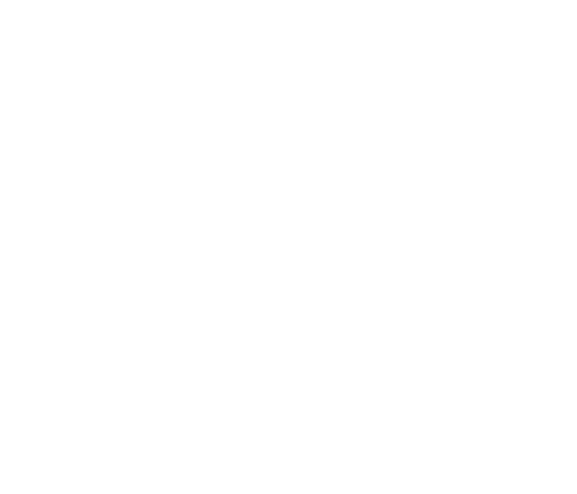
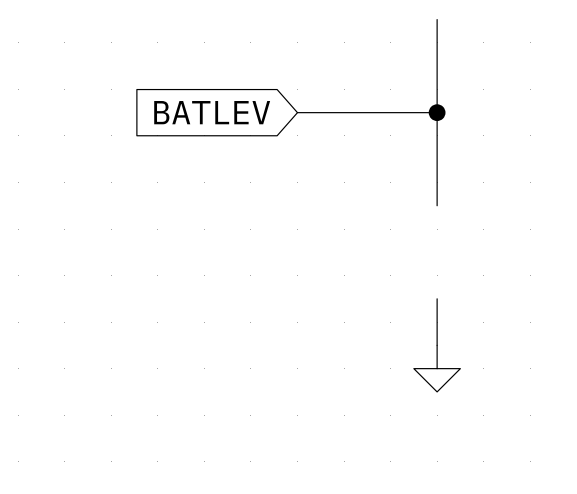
wire: none -> (437, 19) (437, 205)
global label: none -> BATLEV (212, 112)
wire: none -> (297, 112) (437, 112)
junction: none -> (437, 112)
wire: none -> (437, 298) (437, 345)
power symbol: none -> (437, 368)

